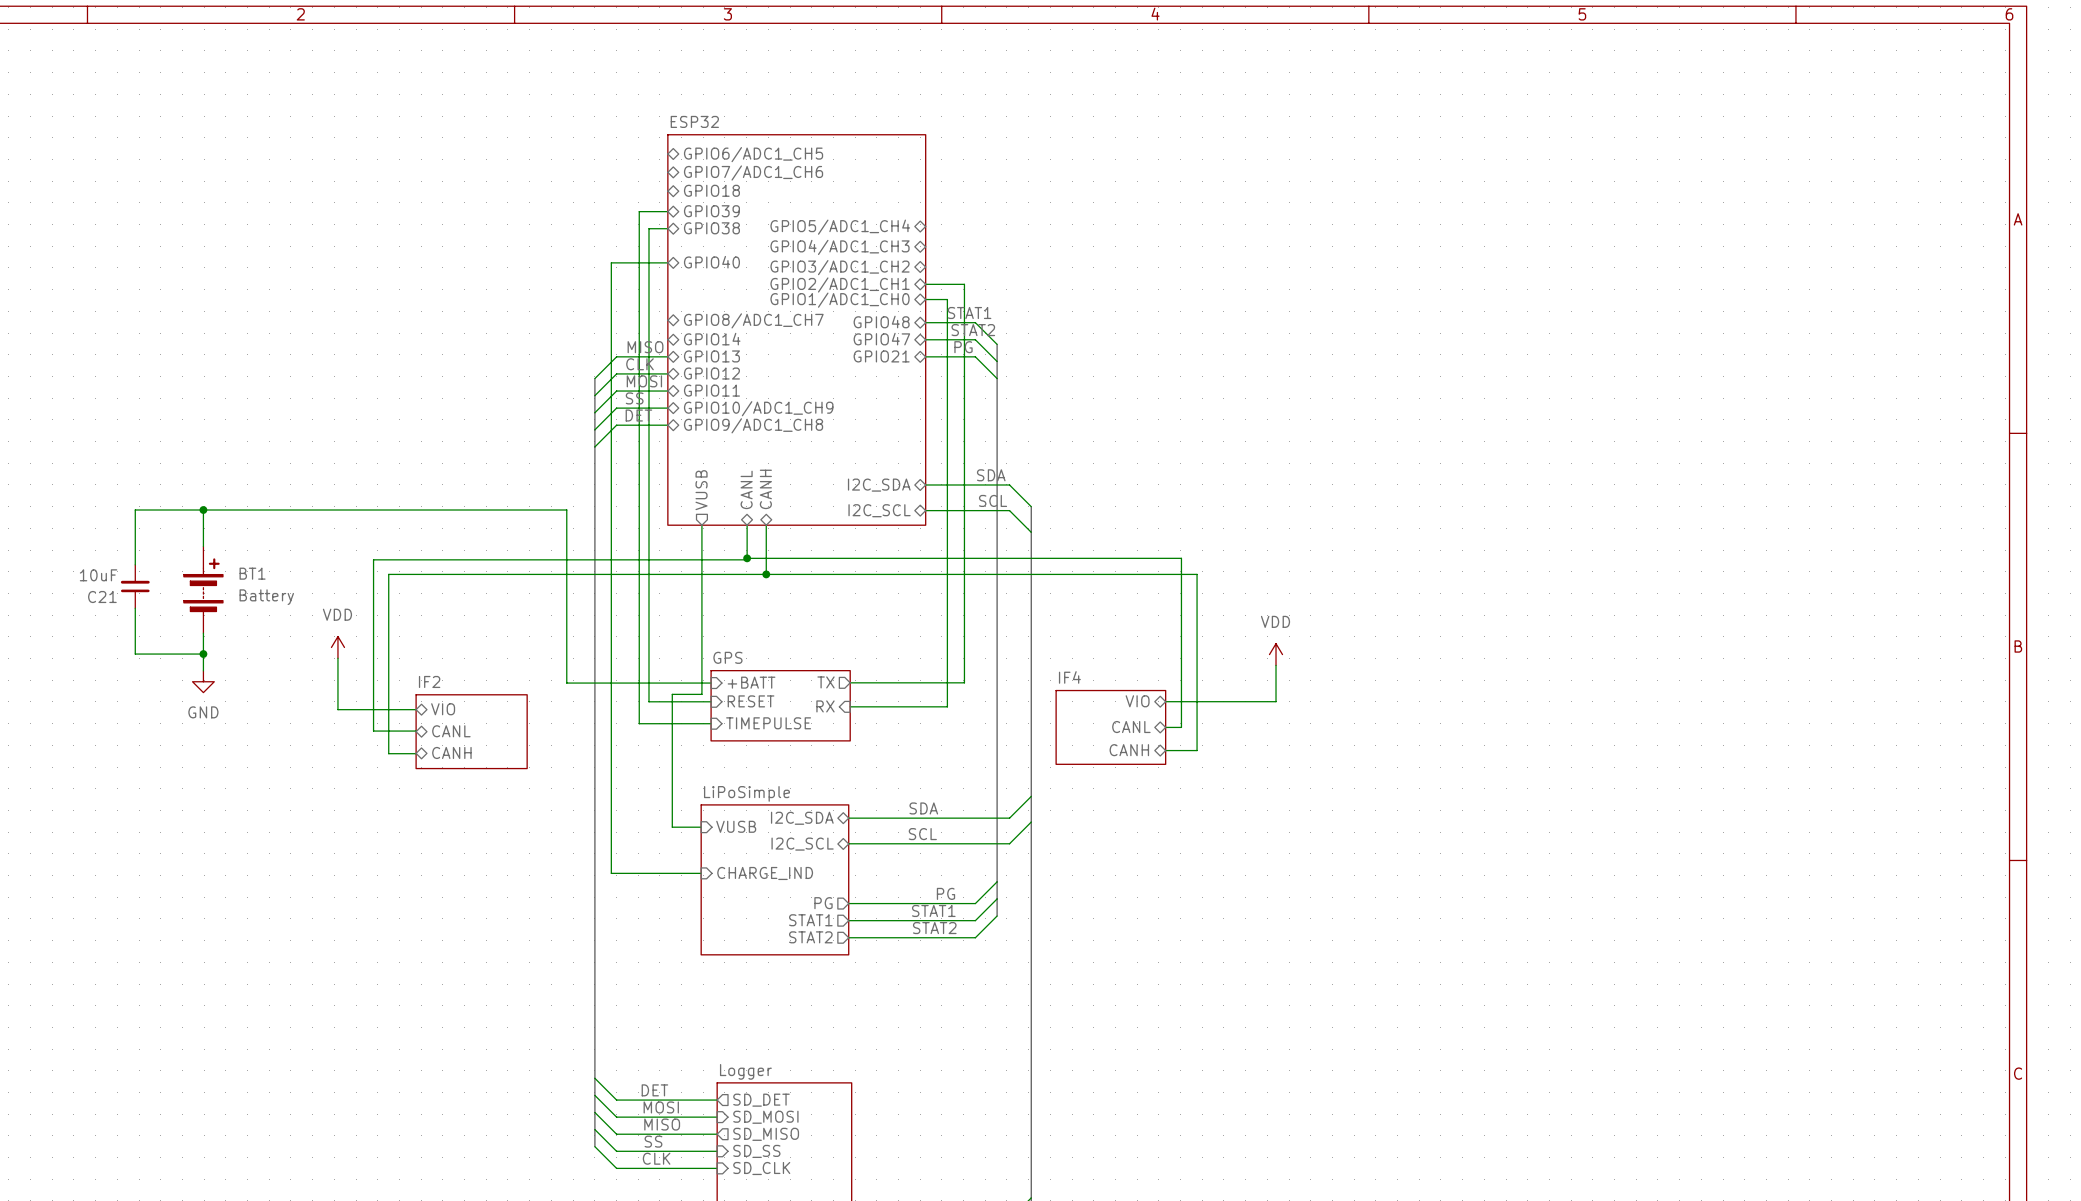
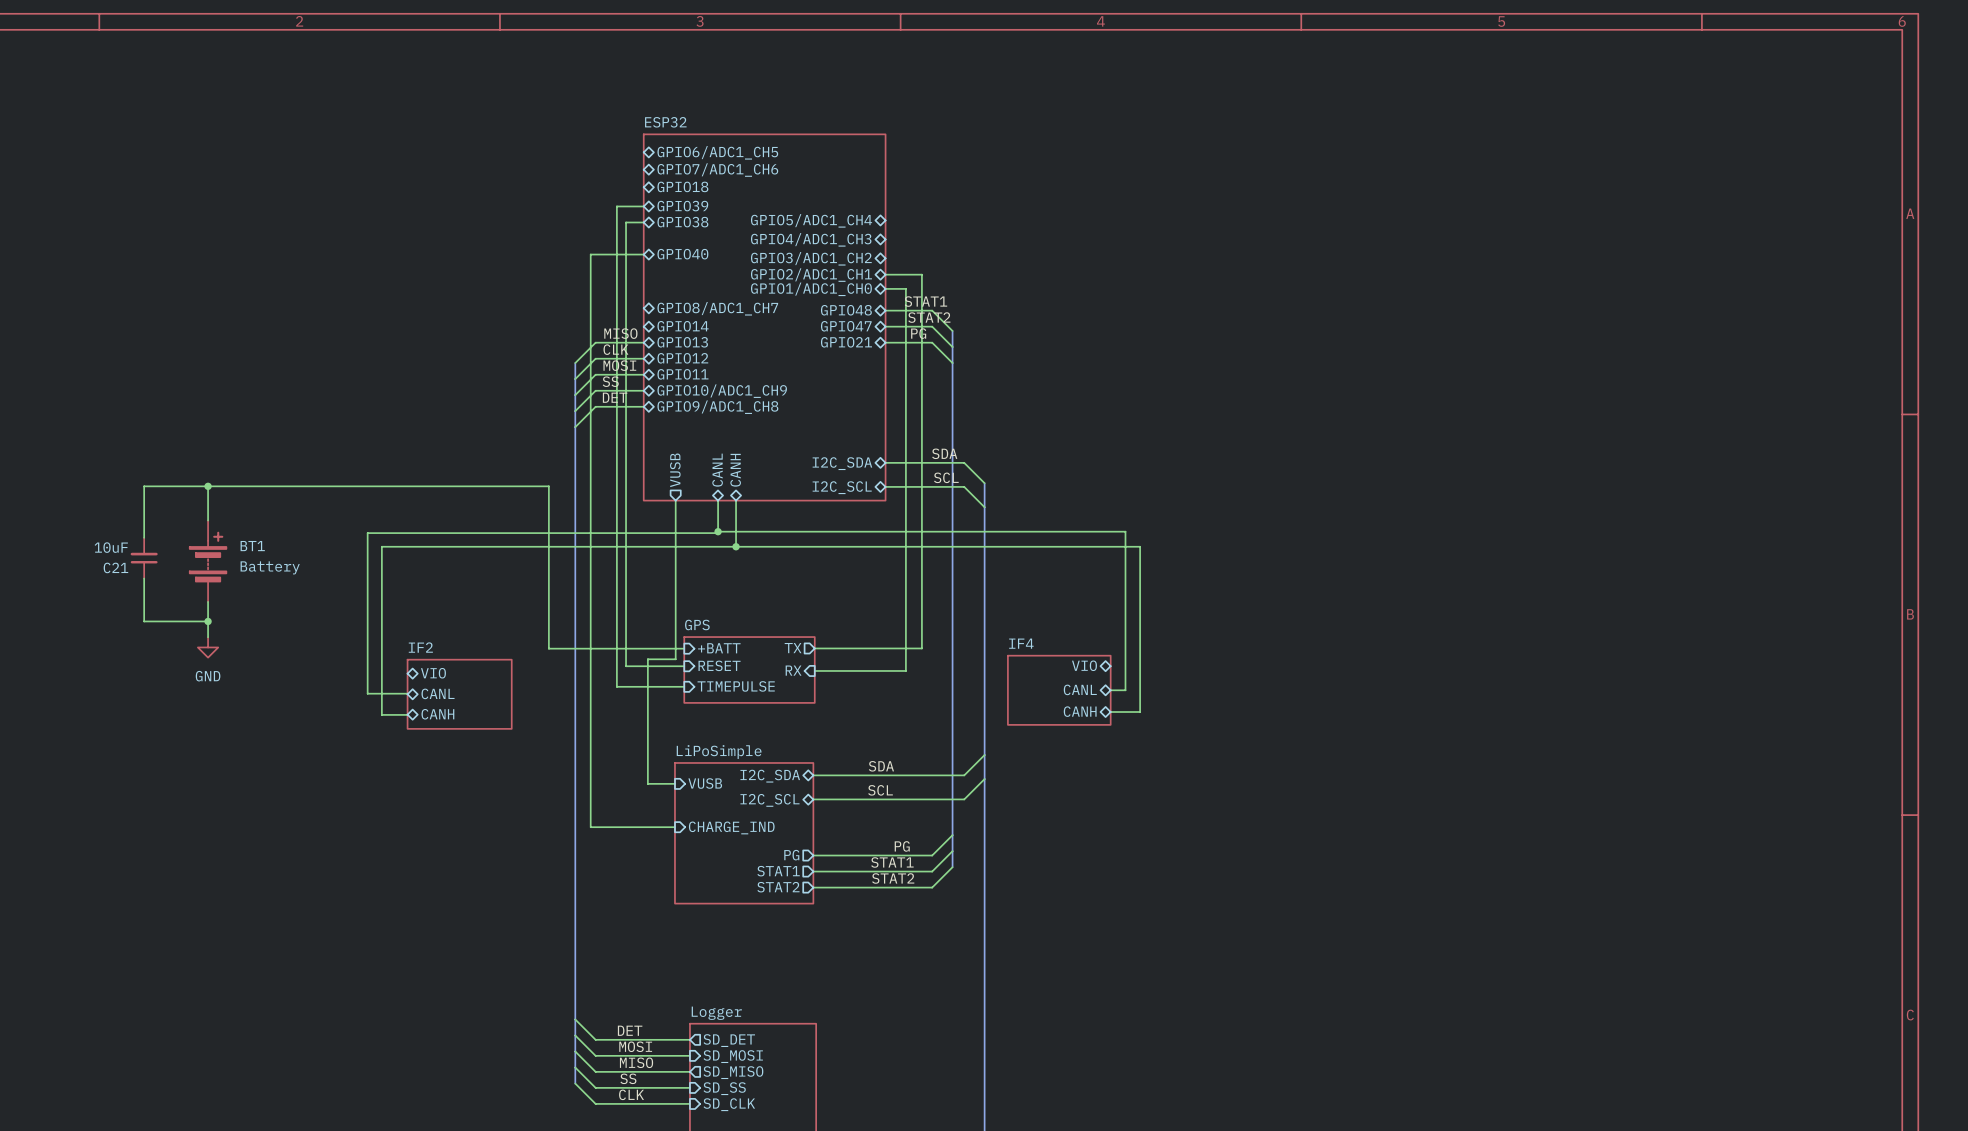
power symbol: VDD (337, 647) -> none
power symbol: VDD (1276, 654) -> none
wire: (337, 658) (337, 709) (416, 709) -> none
wire: (1276, 665) (1276, 701) (1165, 701) -> none

